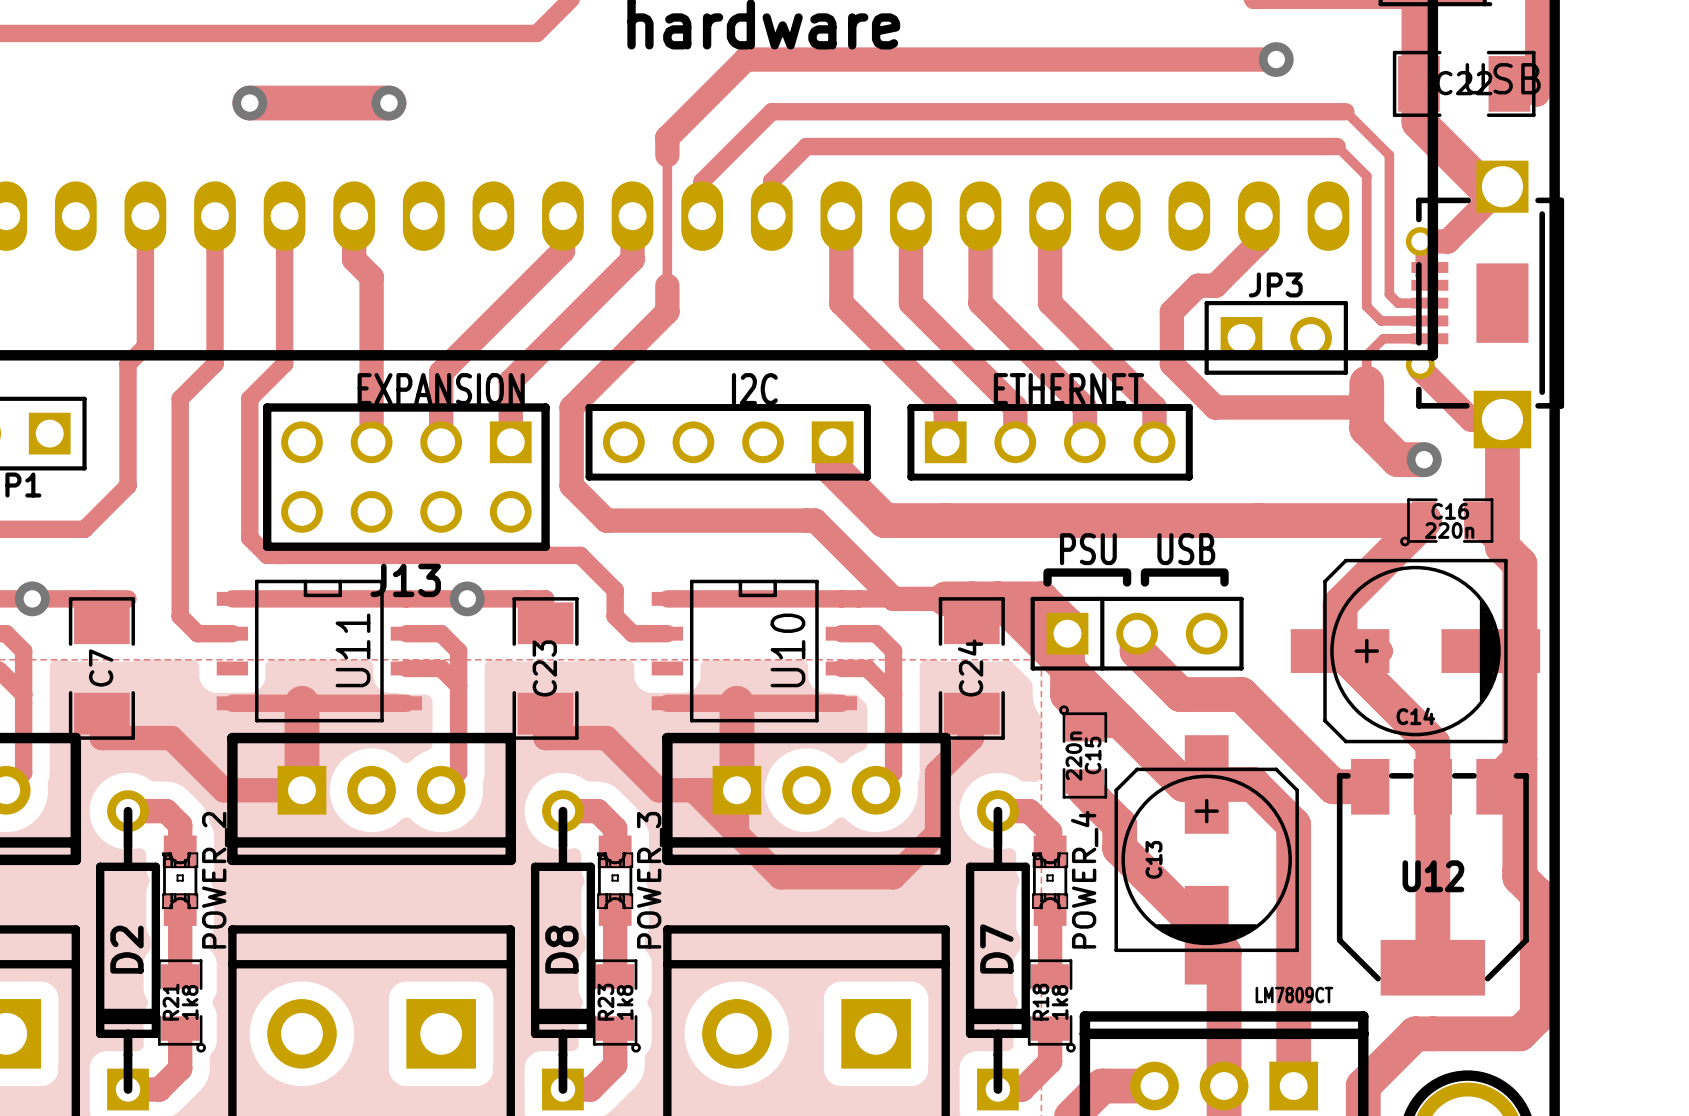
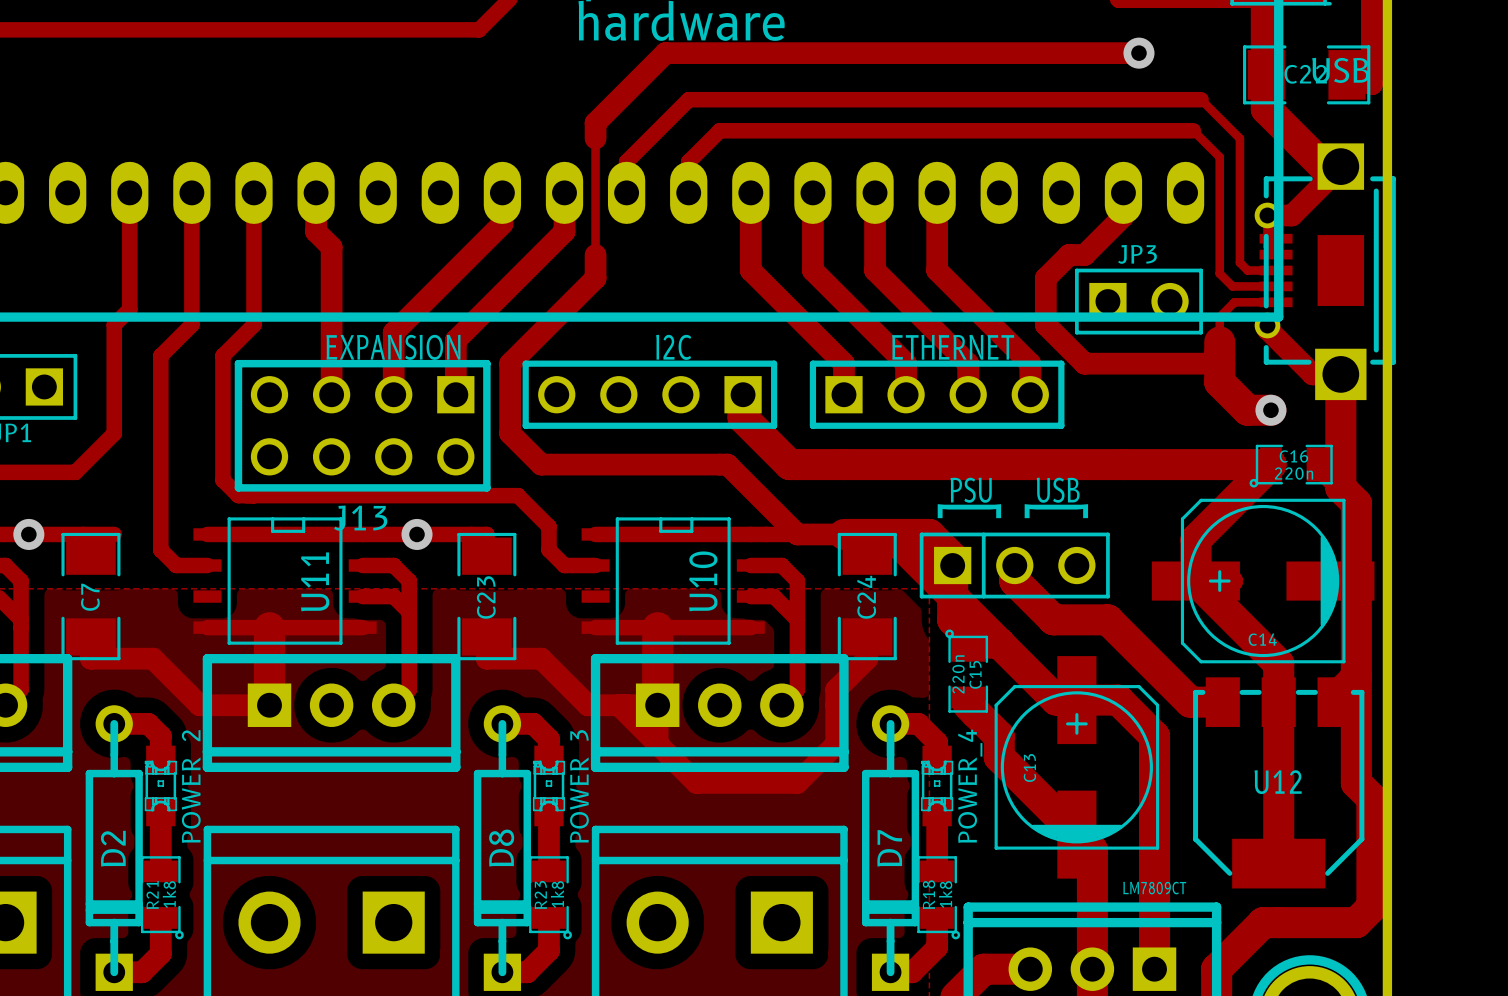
track: (249, 103) (388, 103) -> none
via: (249, 103) -> none
via: (388, 103) -> none

